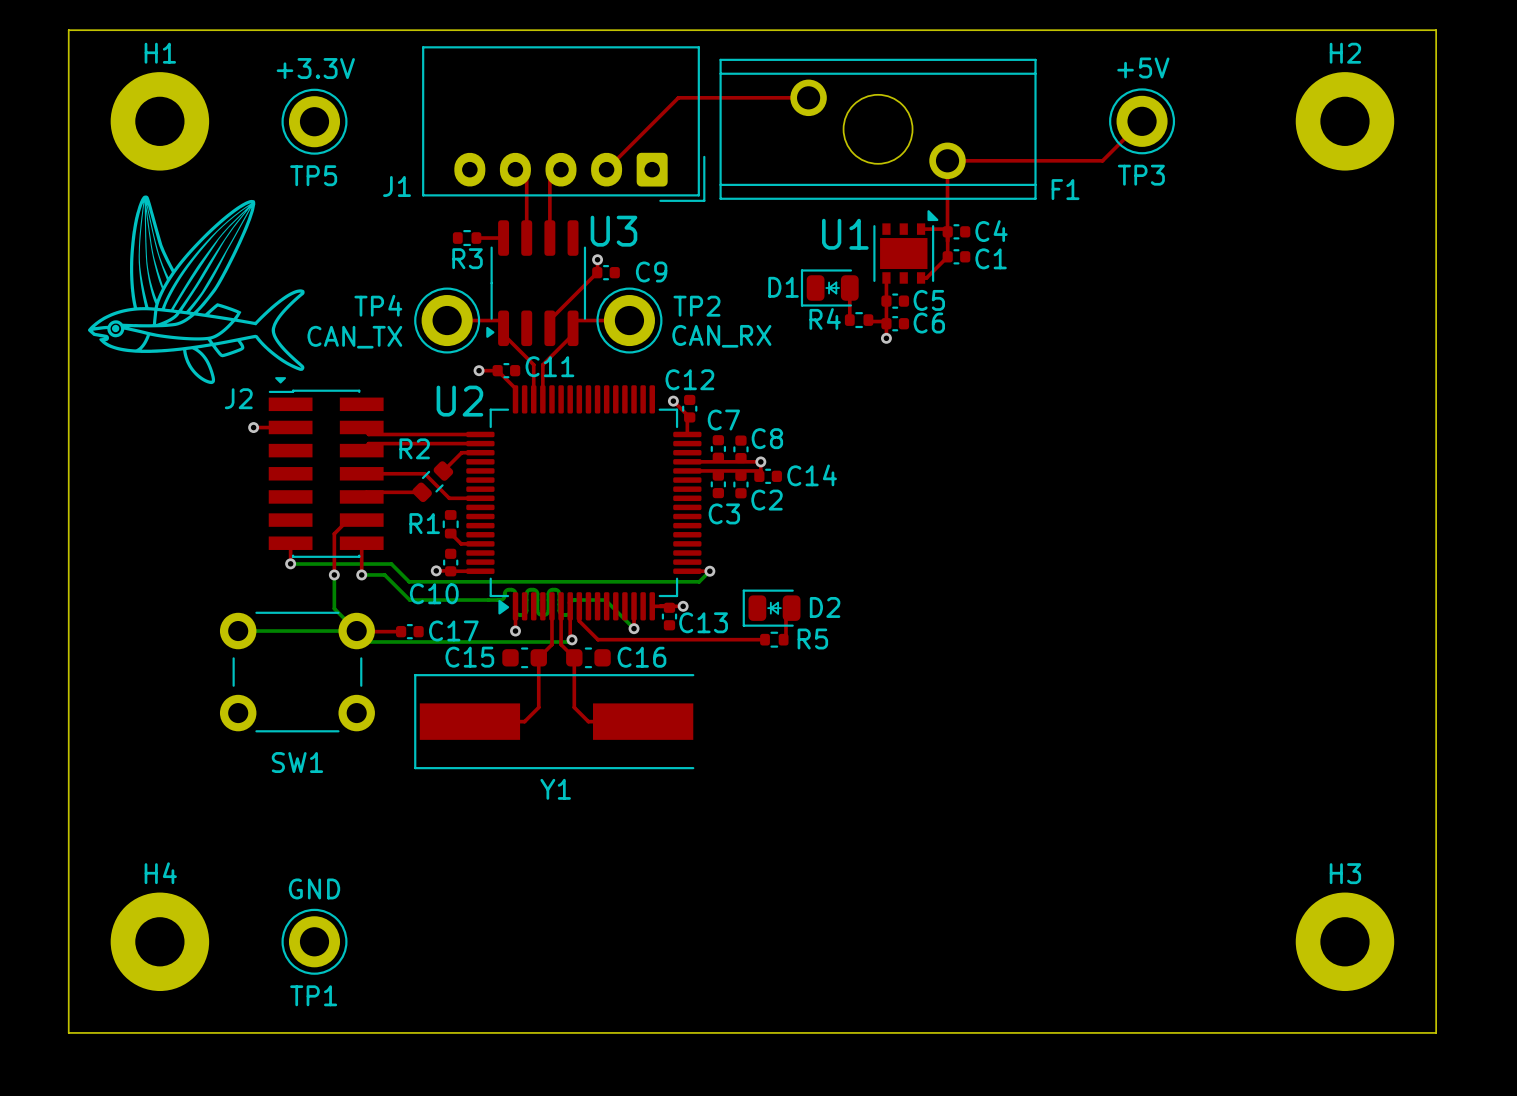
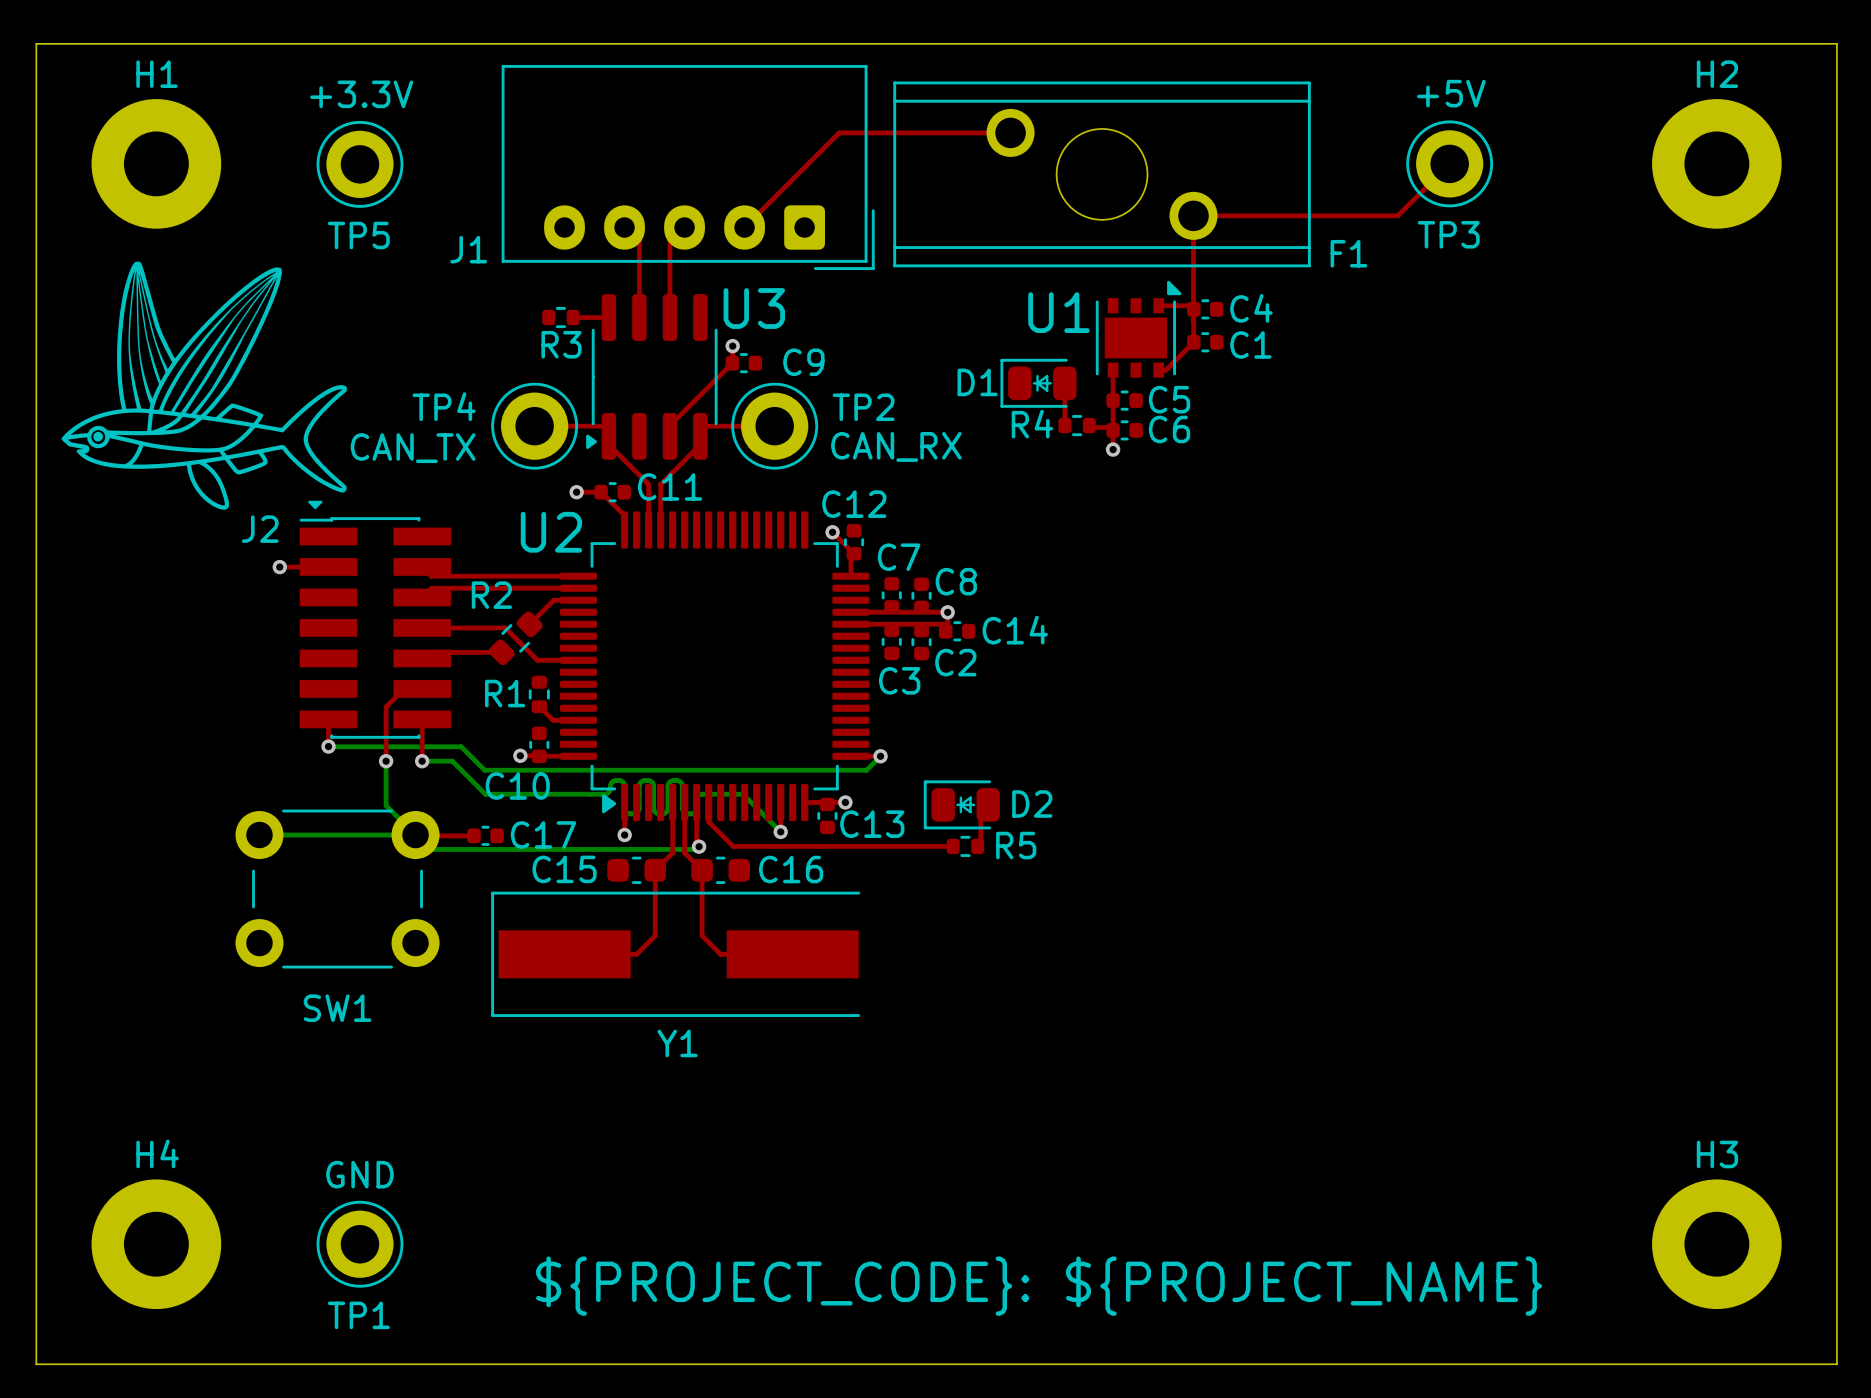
text: none -> ${PROJECT_CODE}: ${PROJECT_NAME} (1039, 1286)

